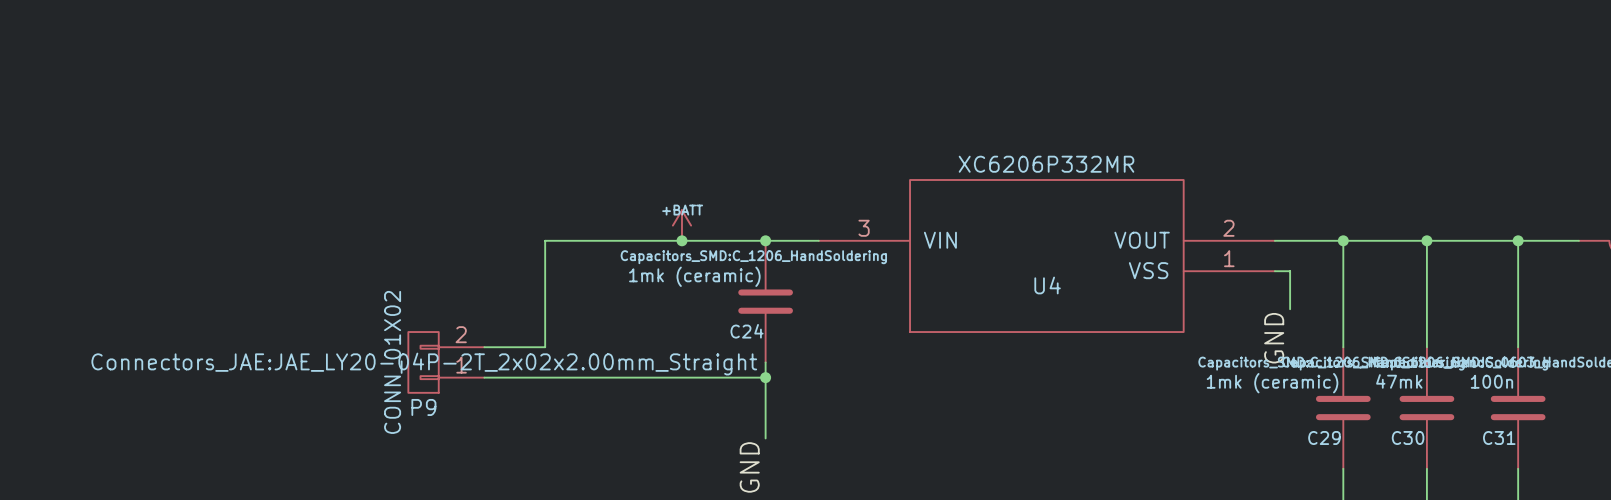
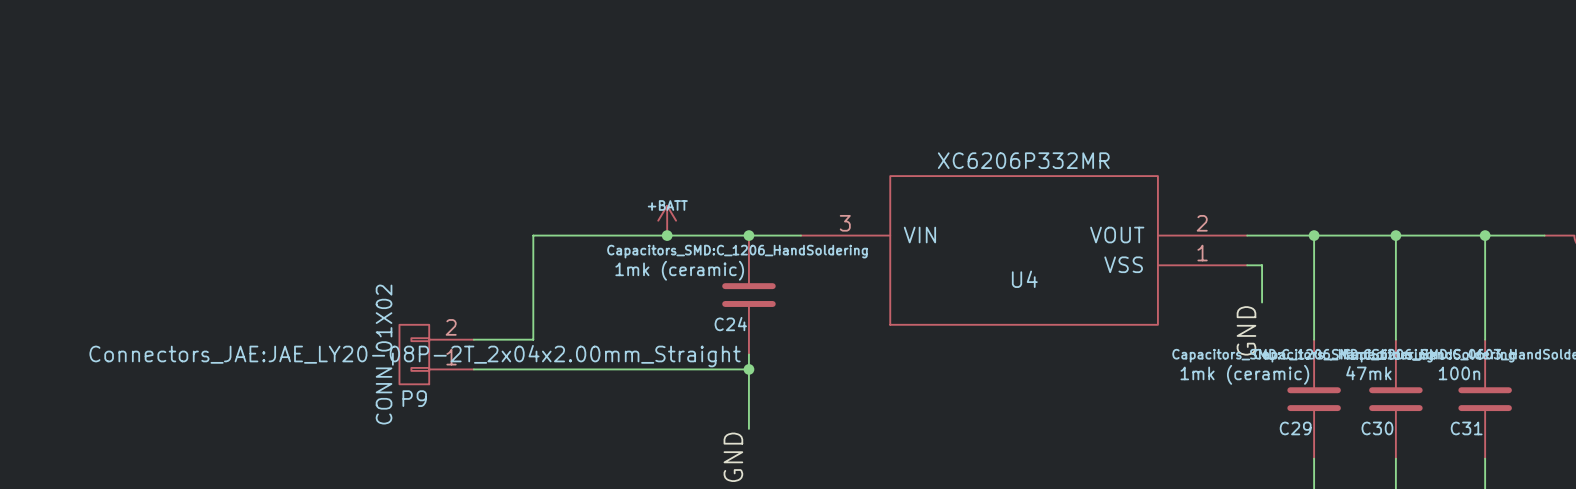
P9 text: Connectors_JAE:JAE_LY20-04P-2T_2x02x2.00mm_Straight (424, 364) -> Connectors_JAE:JAE_LY20-08P-2T_2x04x2.00mm_Straight (415, 356)

